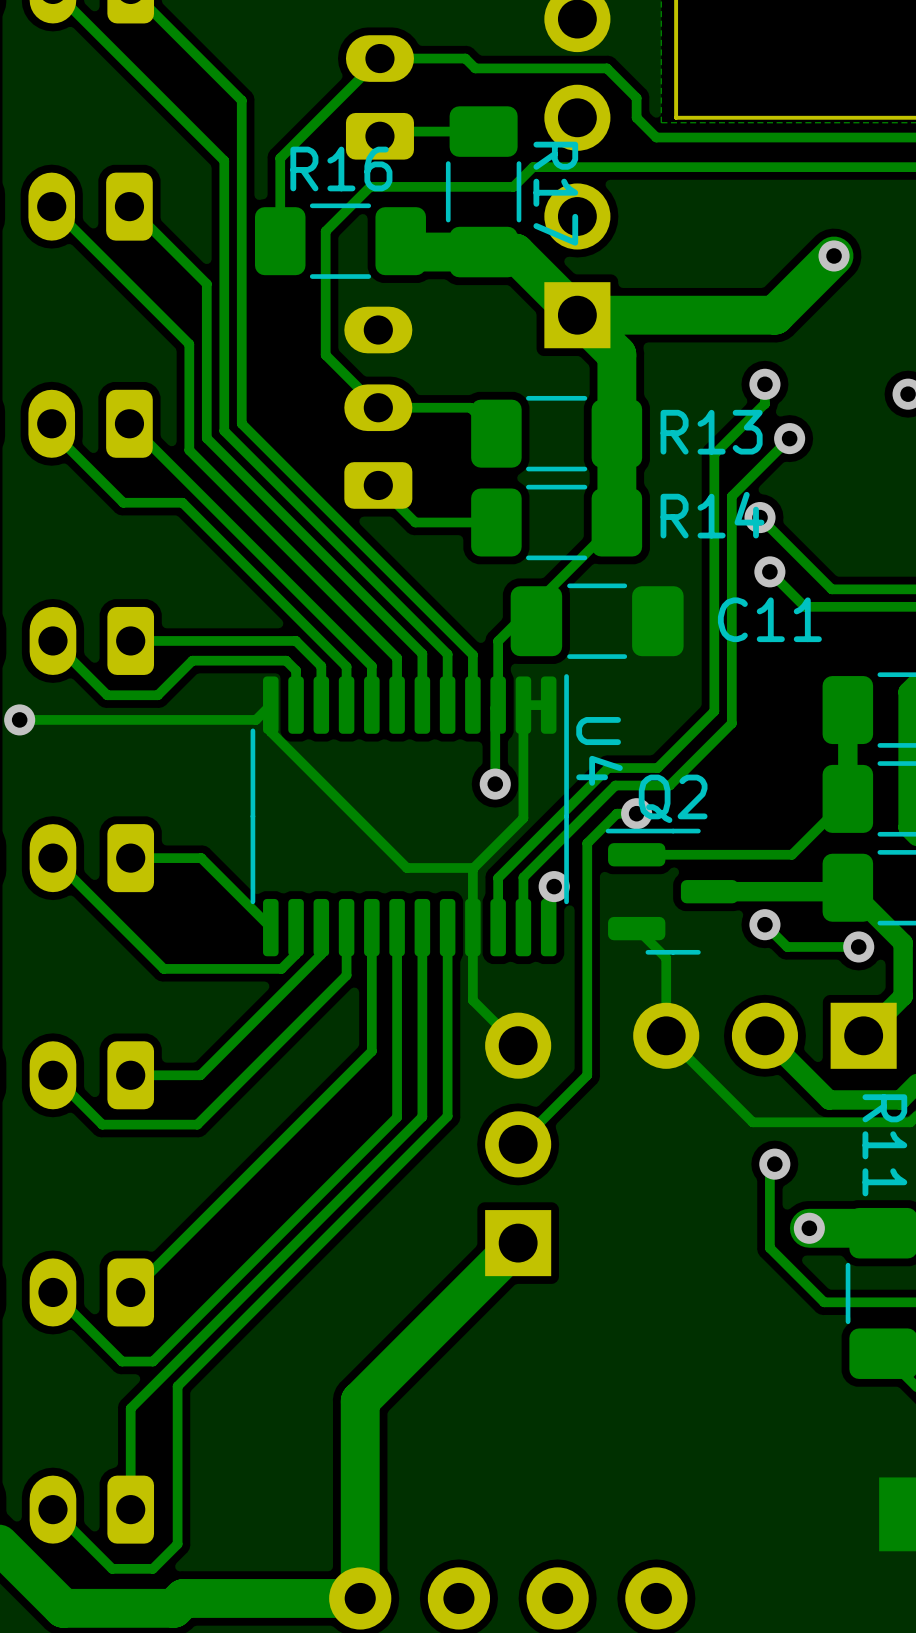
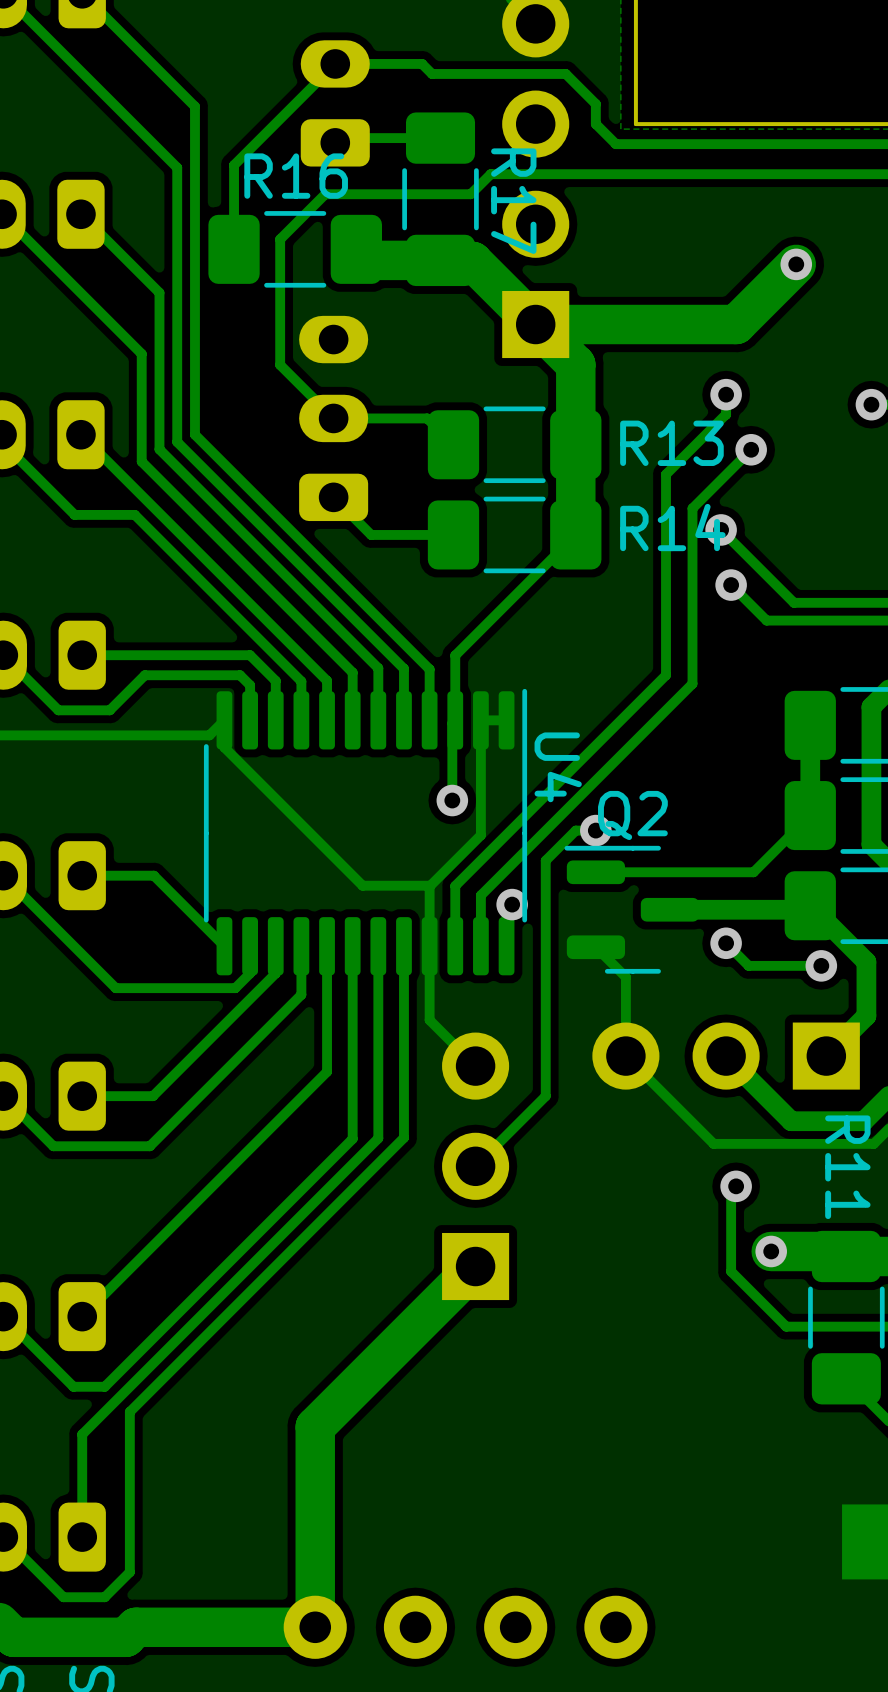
track: (714, 454) (714, 711) (657, 768) (608, 768) (498, 878) -> (674, 465) (665, 474) (665, 675) (455, 885) (455, 895)
C11: (597, 621) -> none
track: (731, 669) (731, 723) (669, 785) (615, 785) (523, 877) -> (692, 683) (480, 895)

